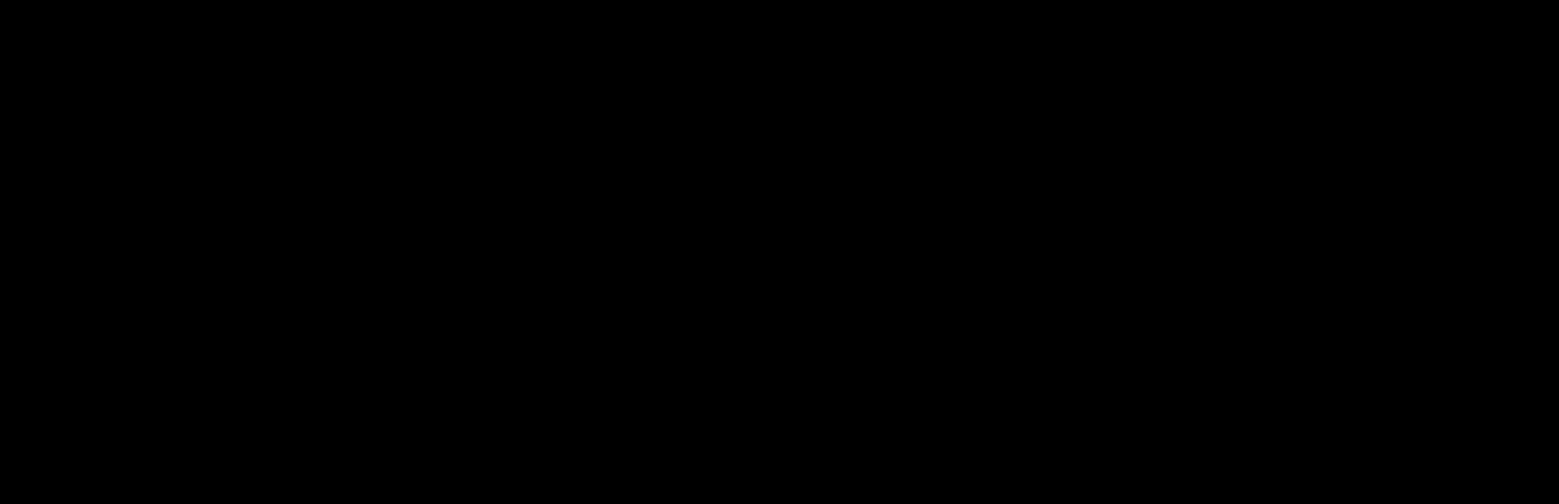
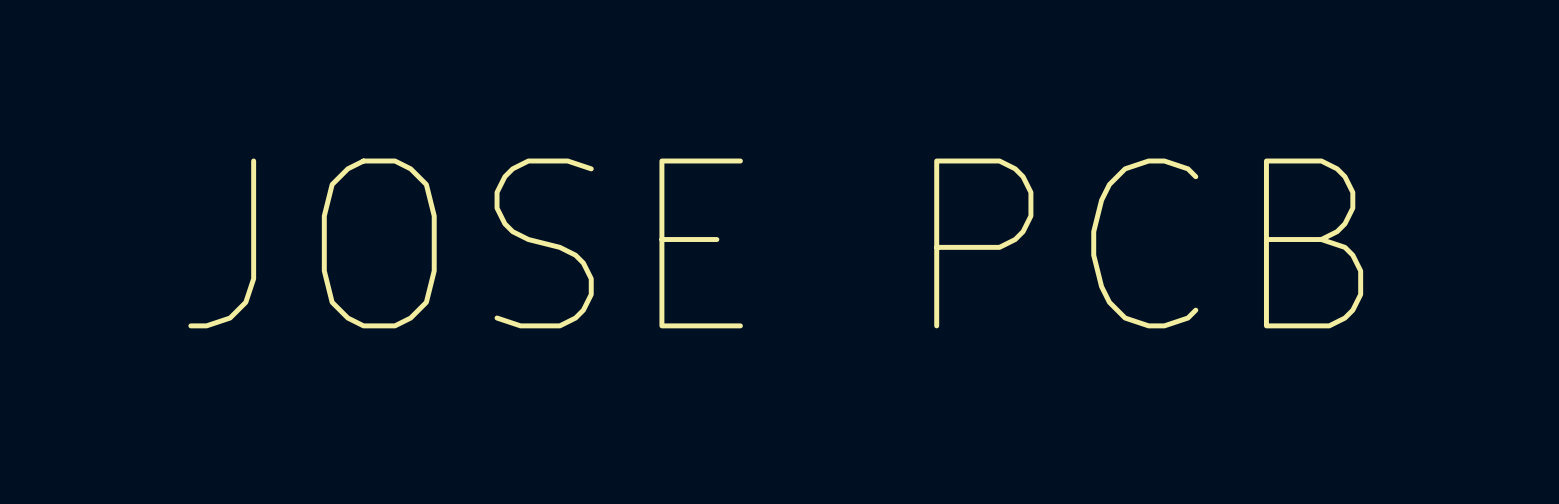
text: none -> JOSE PCB (775, 243)

